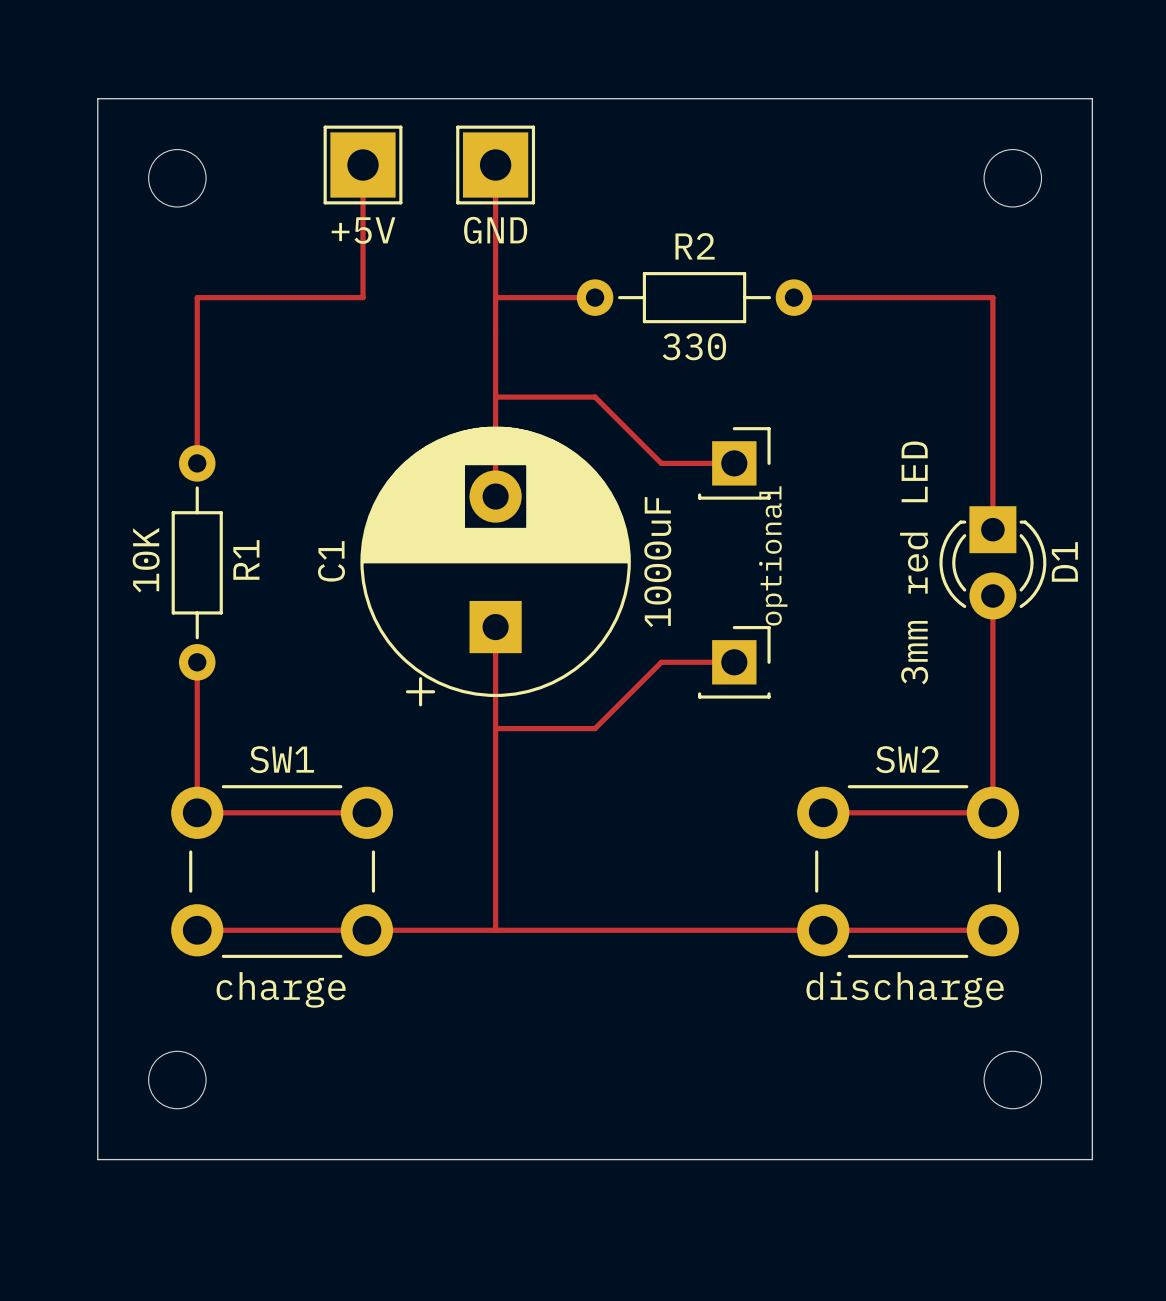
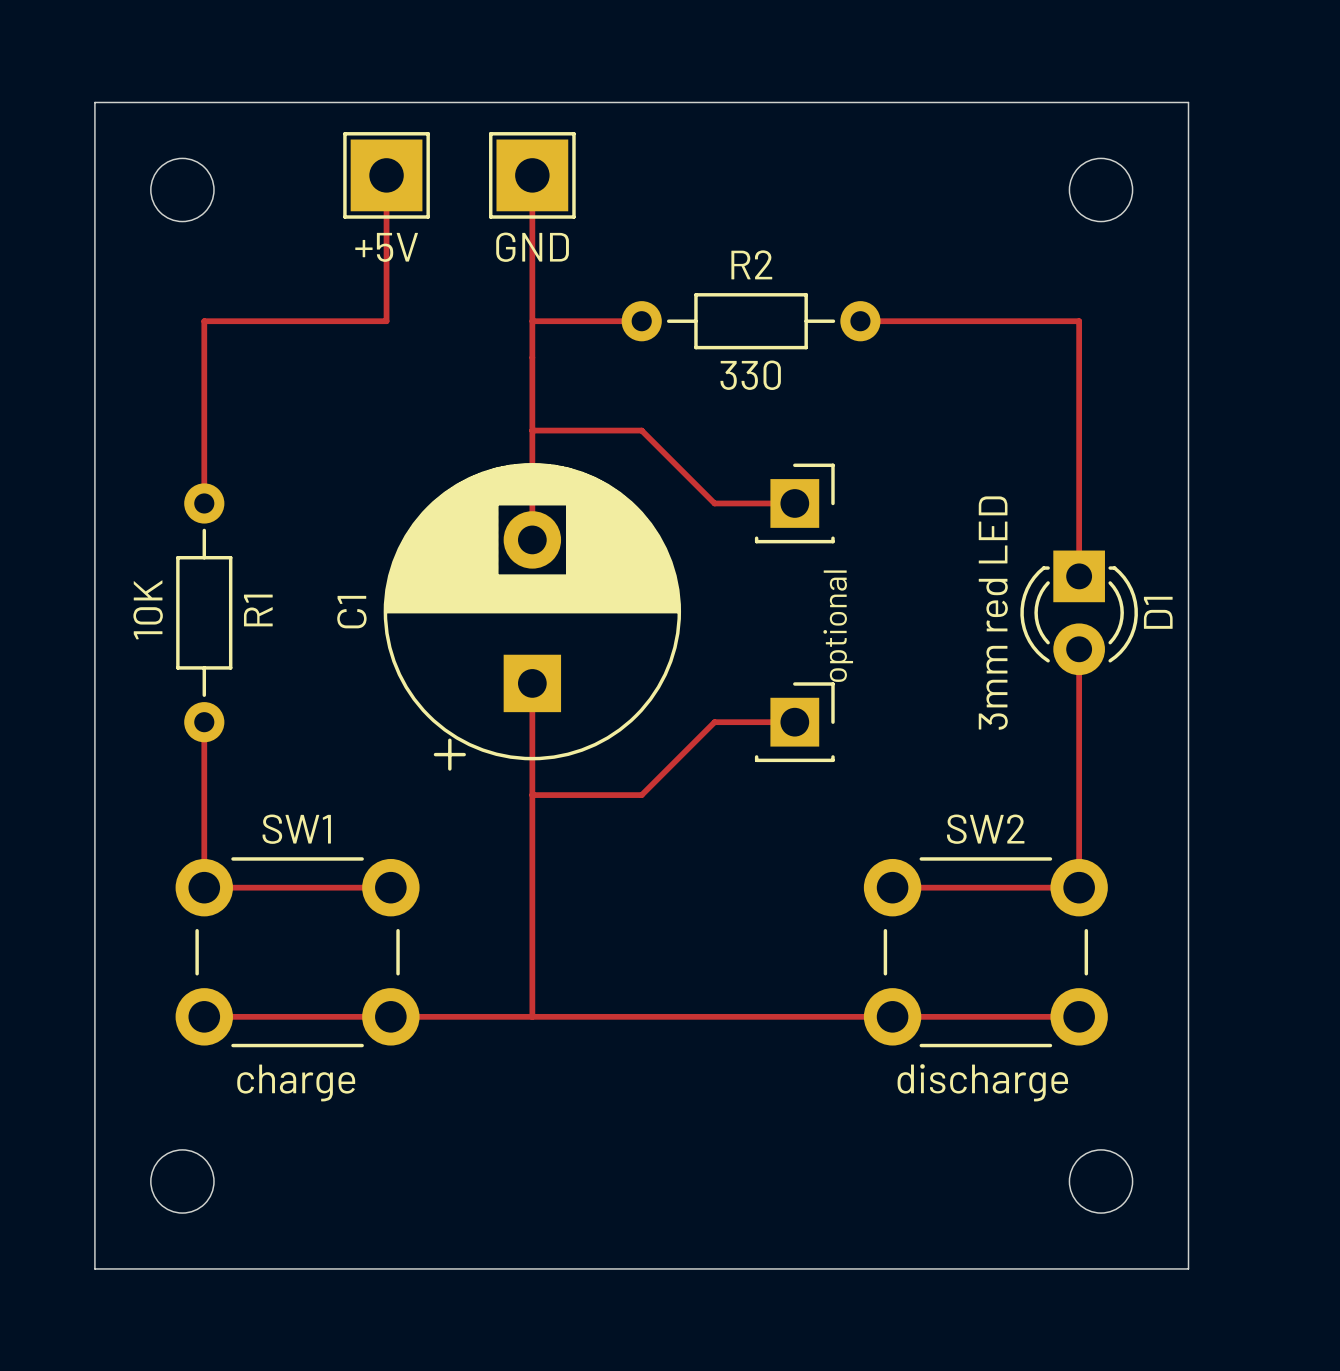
C1 value: 1000uF (657, 562) -> none

